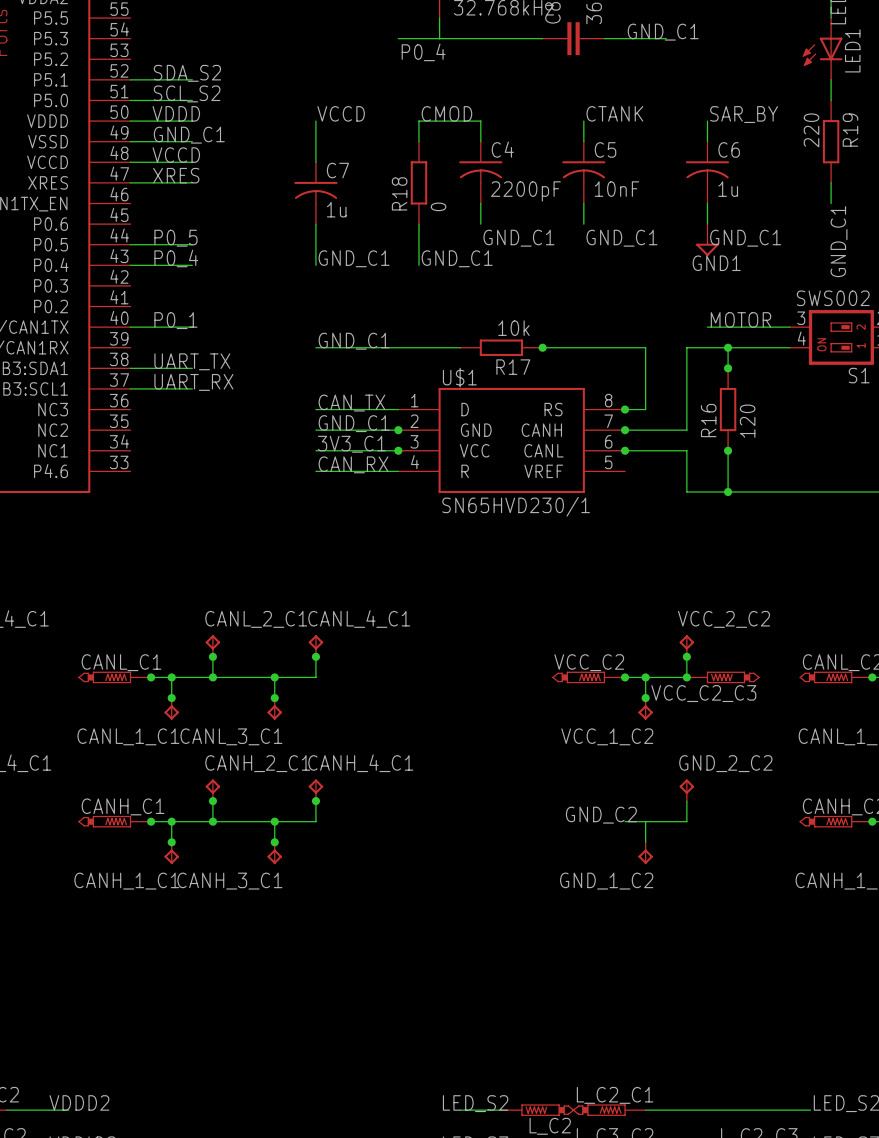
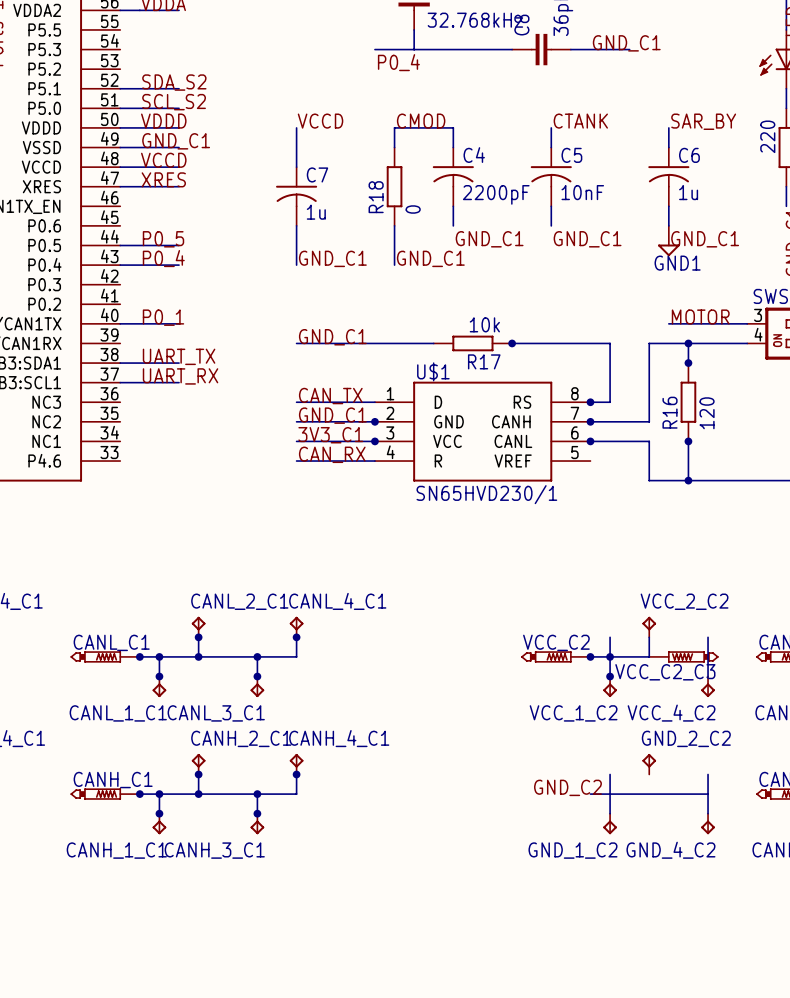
wire: none -> (610, 637) (610, 656)
junction: (686, 656) -> none
wire: none -> (708, 637) (708, 676)
junction: (686, 677) -> none
VCC_4_C2: none -> (708, 686)
wire: none -> (610, 774) (610, 794)
wire: (686, 801) (686, 821) -> (708, 794) (649, 794)
wire: none -> (708, 774) (708, 813)
GND_4_C2: none -> (708, 823)

